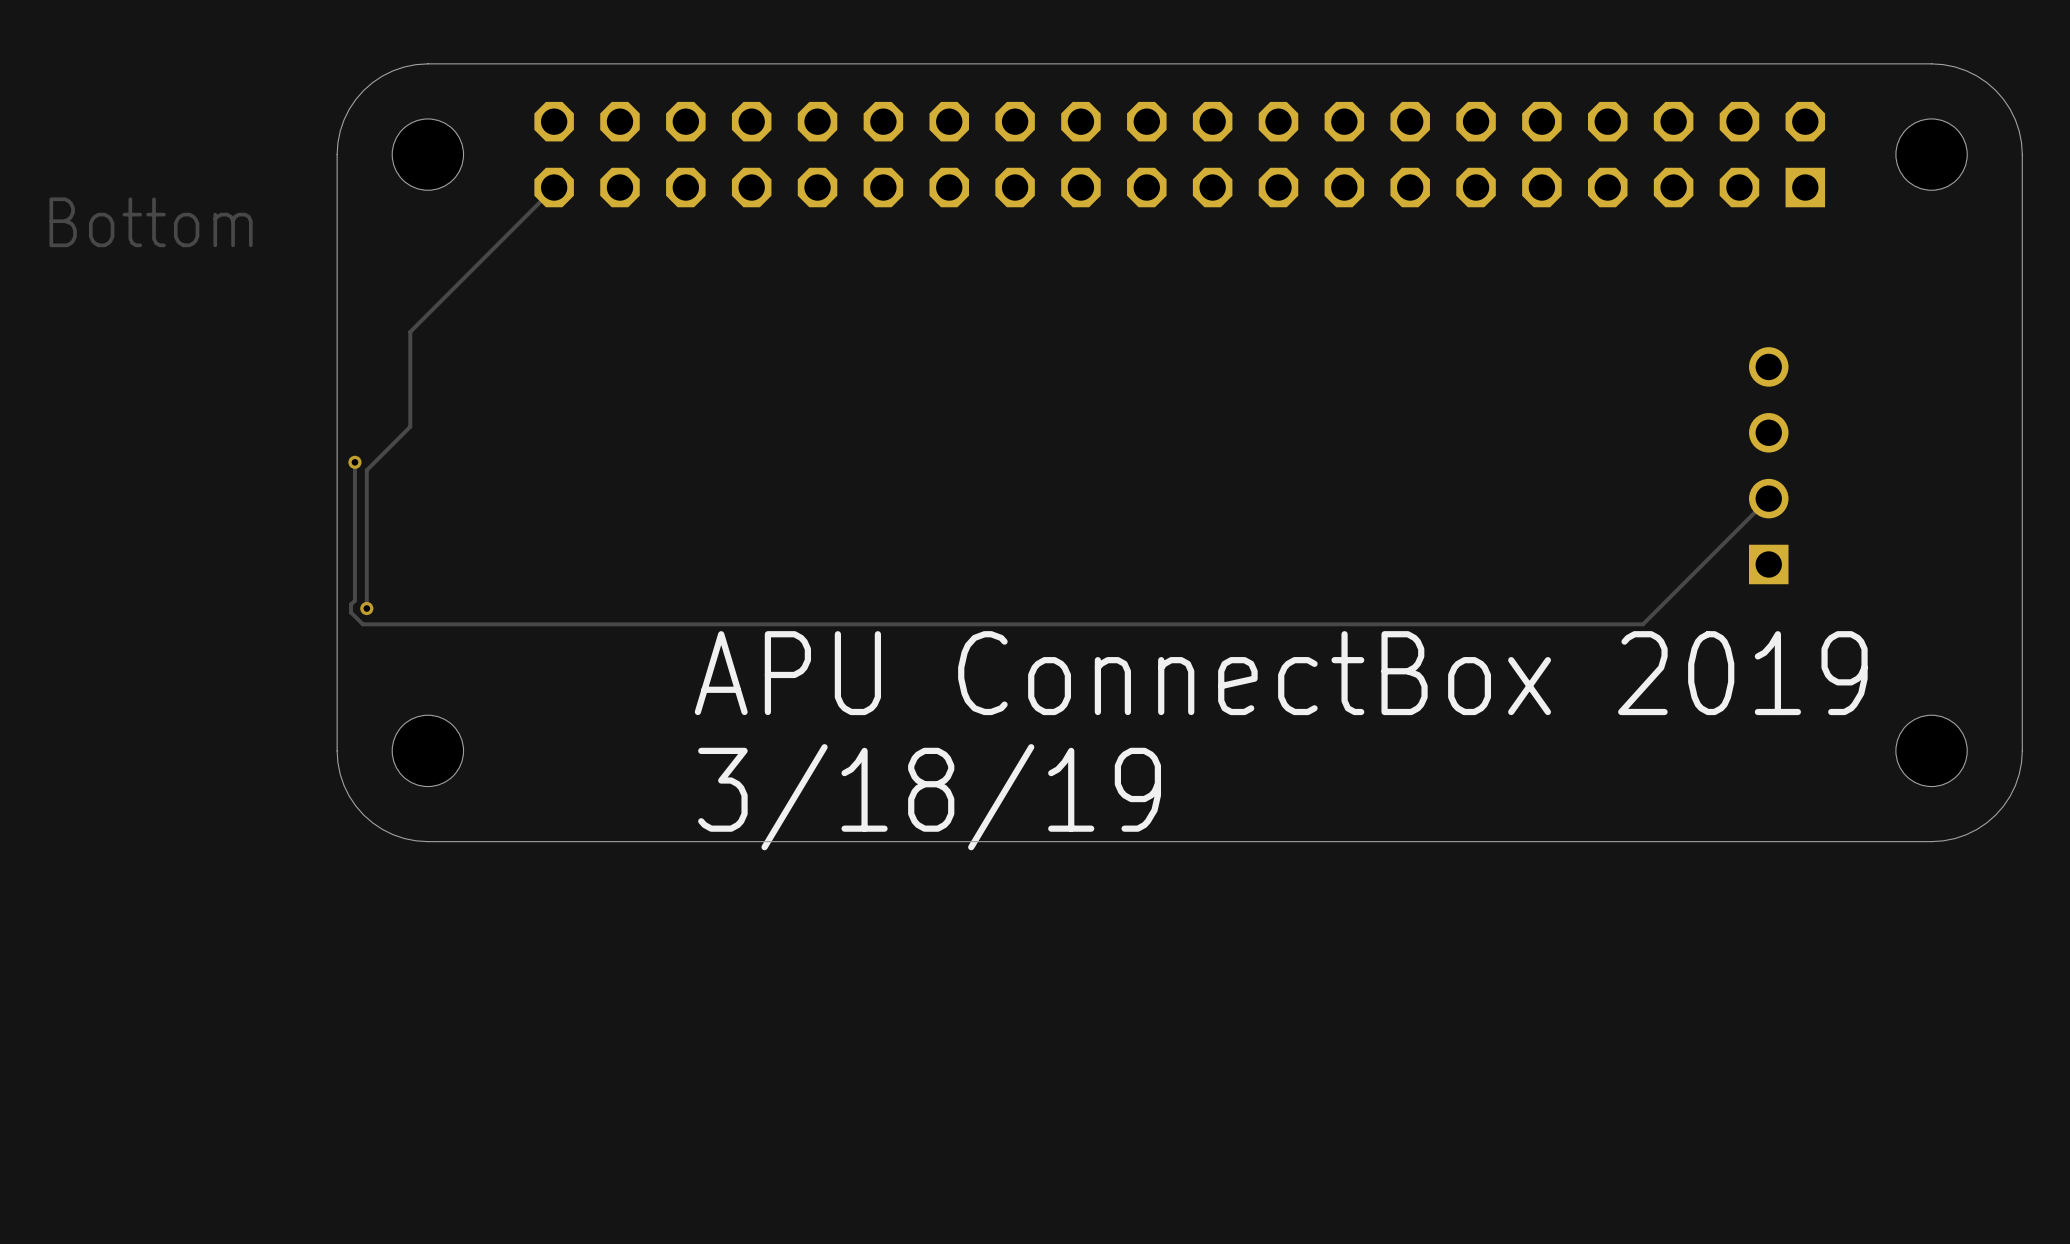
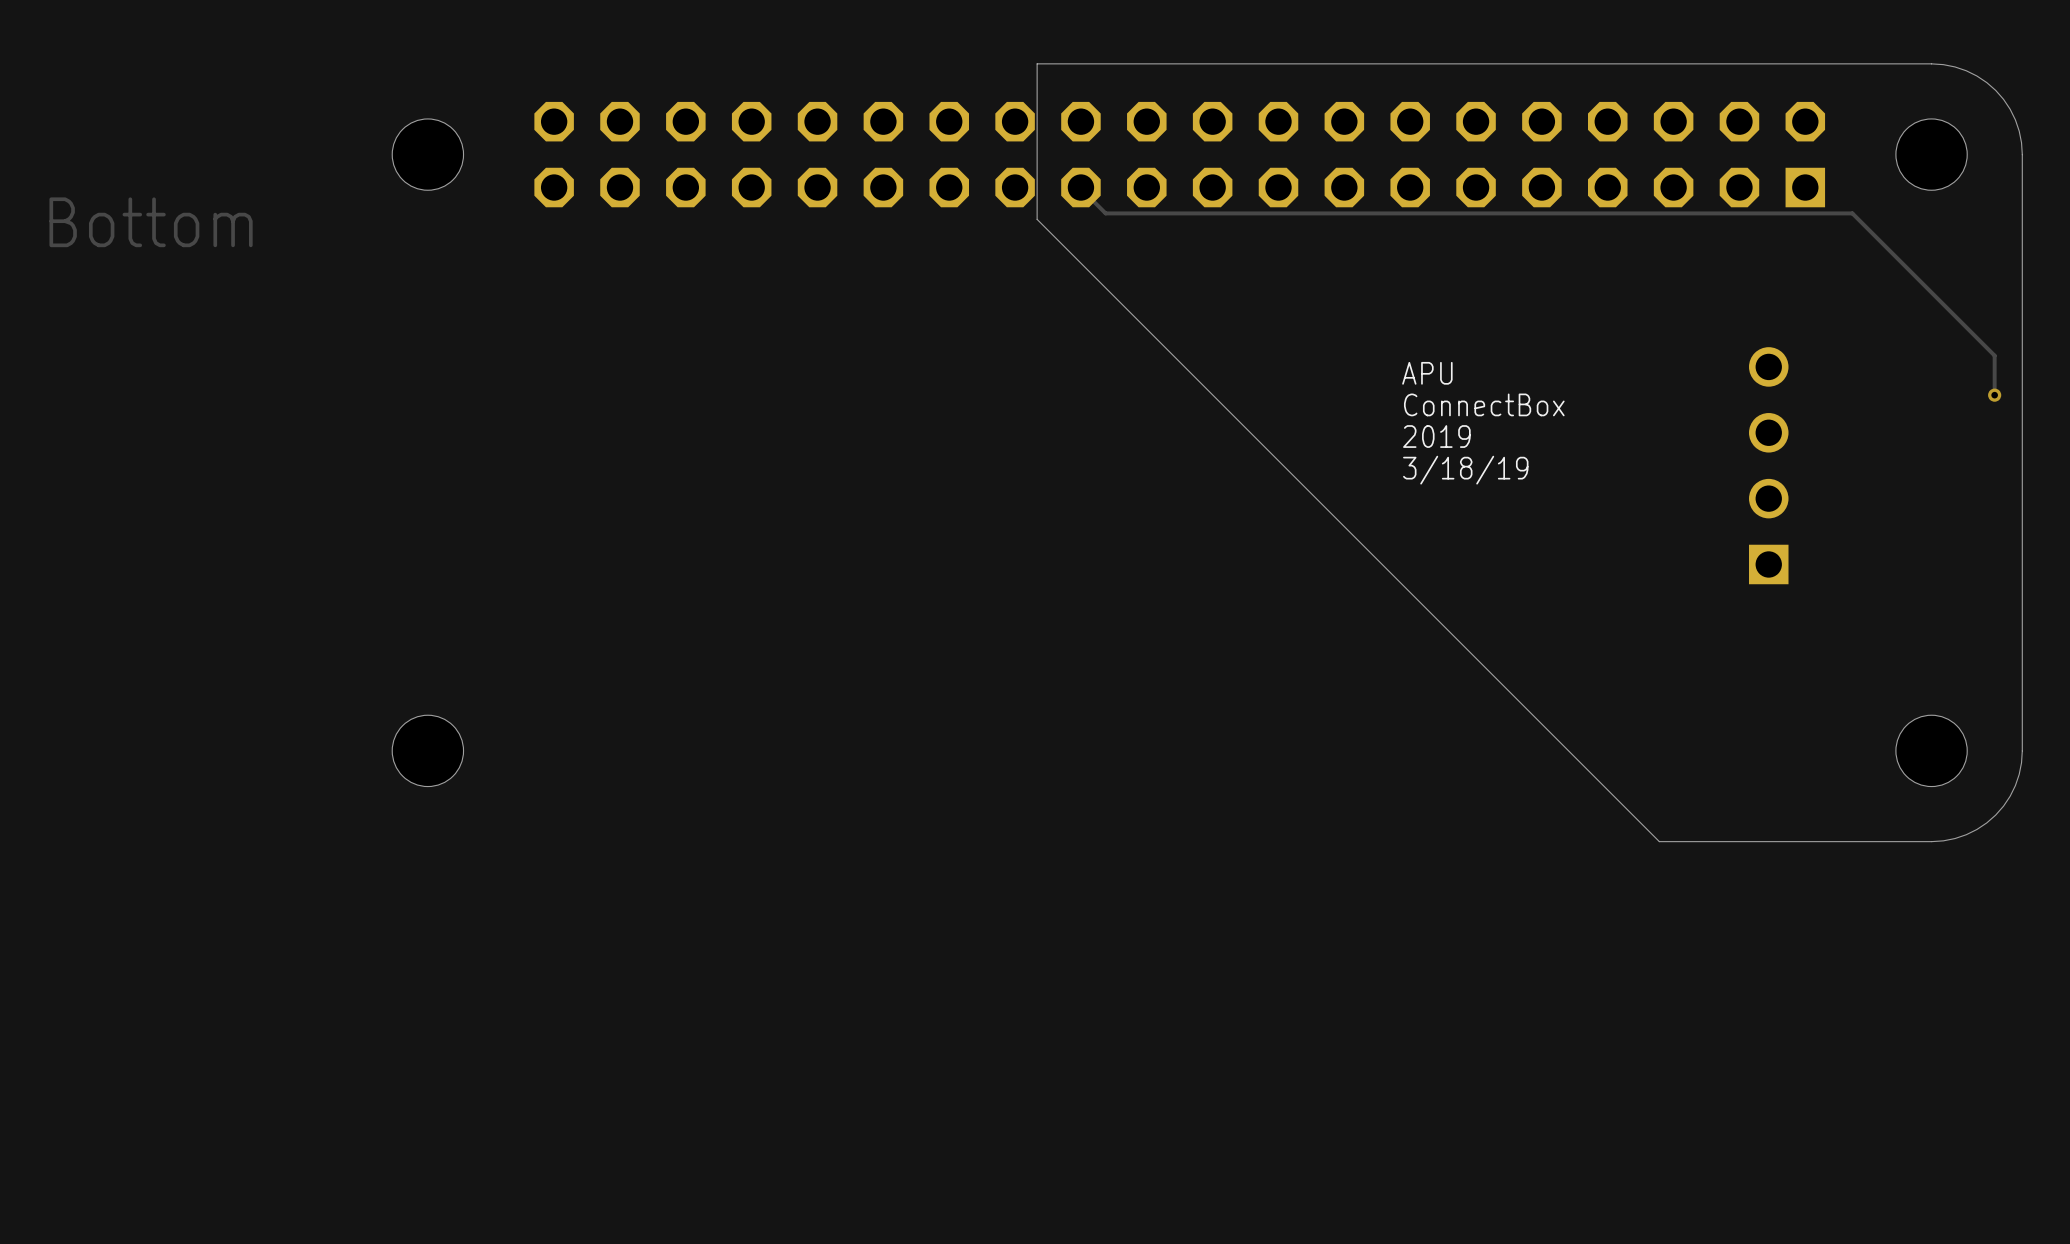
board edge: (1037, 63) (427, 63) (416, 64) (393, 70) (382, 76) (363, 90) (349, 109) (344, 119) (337, 142) (337, 154) (337, 750) (337, 762) (344, 785) (355, 806) (372, 822) (393, 834) (416, 840) (427, 841) (1659, 841) -> (1037, 63) (1037, 219) (1659, 841)
track: (554, 187) (410, 331) (410, 426) (366, 470) (366, 608) -> none
track: none -> (1080, 187) (1105, 213) (1852, 213) (1994, 355) (1994, 395)
text: none -> APU (1427, 373)
via: none -> (1994, 395)
text: none -> ConnectBox (1484, 404)
text: none -> 2019 (1436, 436)
track: (354, 462) (354, 600) (351, 604) (351, 612) (362, 624) (1643, 624) (1768, 498) -> none
via: (354, 462) -> none
text: none -> 3/18/19 (1465, 470)
via: (366, 608) -> none
text: APU ConnectBox 2019 (1281, 673) -> none
text: 3/18/19 (929, 797) -> none

